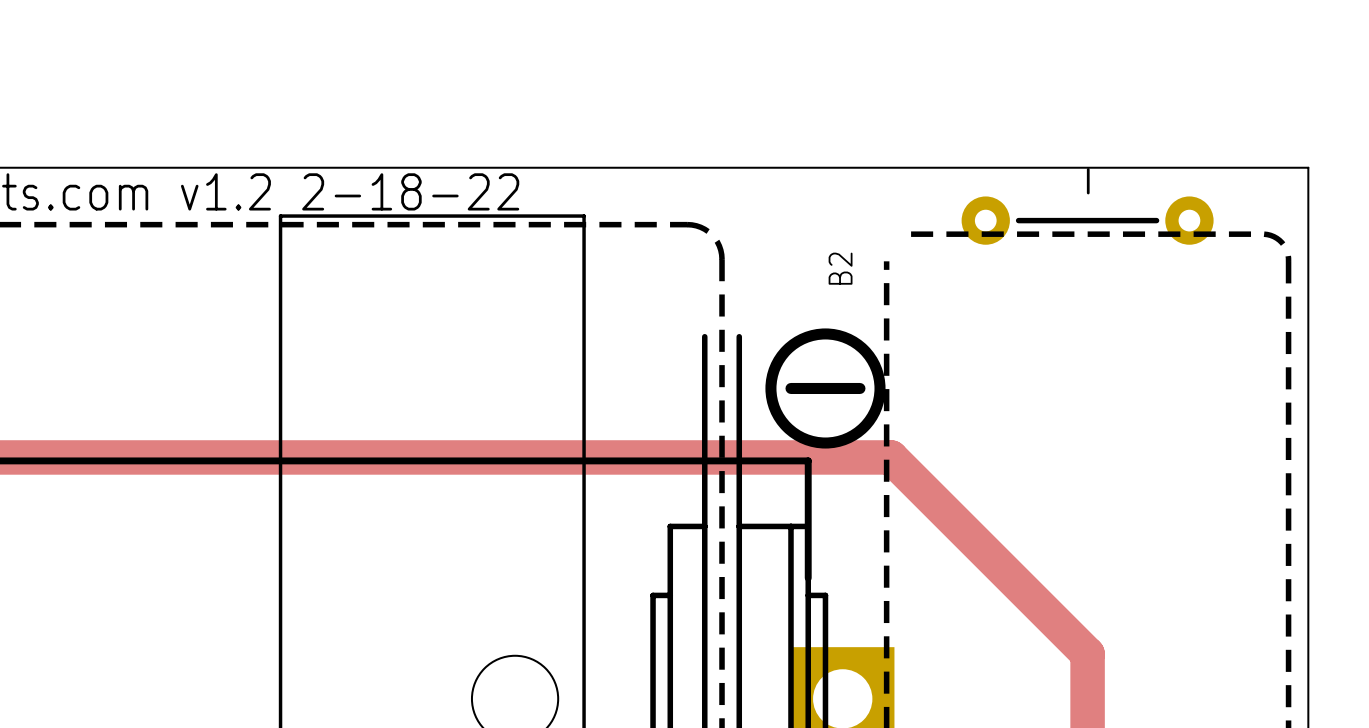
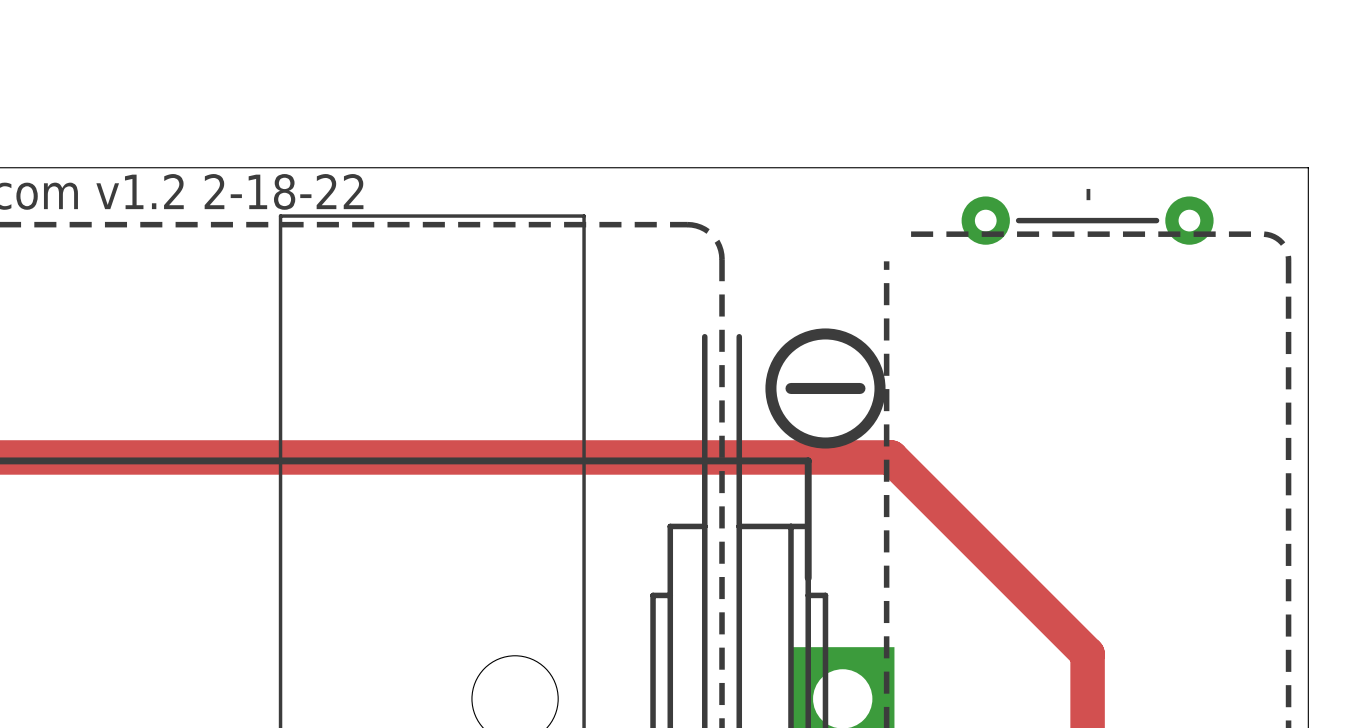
B2 name: B2 (840, 268) -> none

